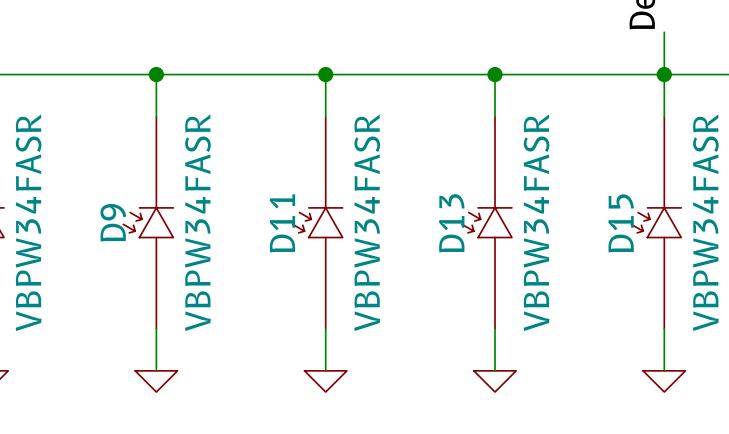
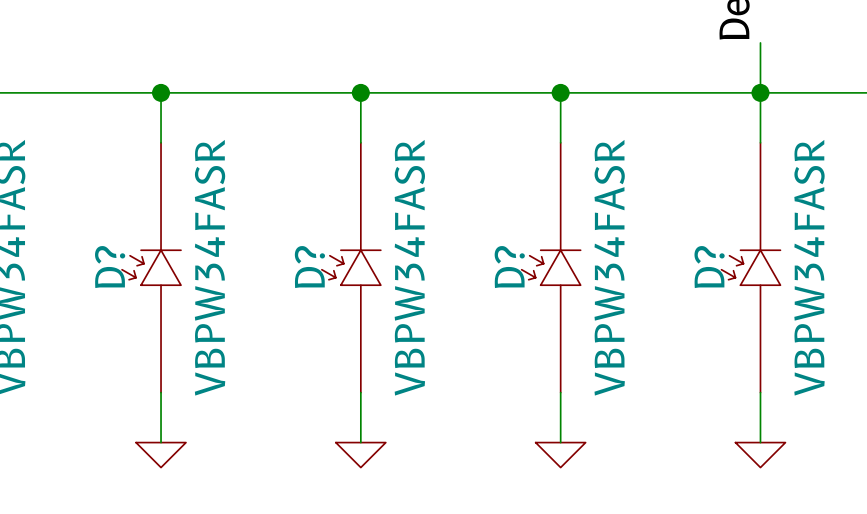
D9 name: D9 (113, 222) -> D? (110, 267)
D11 name: D11 (282, 223) -> D? (309, 267)
D13 name: D13 (451, 223) -> D? (509, 267)
D15 name: D15 (621, 223) -> D? (709, 267)

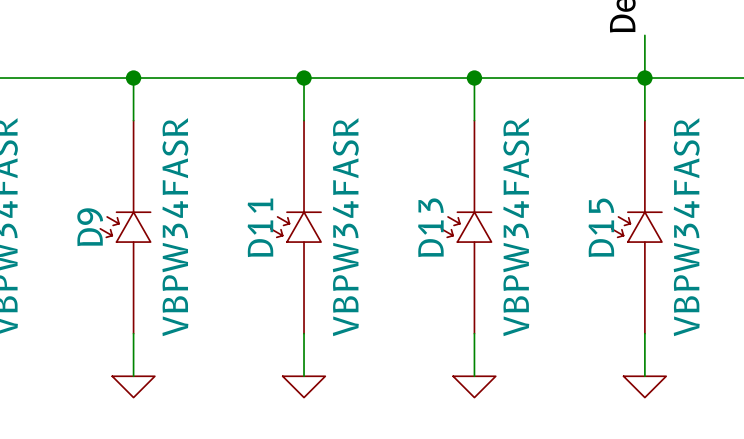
D? name: D? (110, 267) -> D9 (90, 227)
D? name: D? (309, 267) -> D11 (260, 227)
D? name: D? (509, 267) -> D13 (430, 227)
D? name: D? (709, 267) -> D15 (601, 227)

